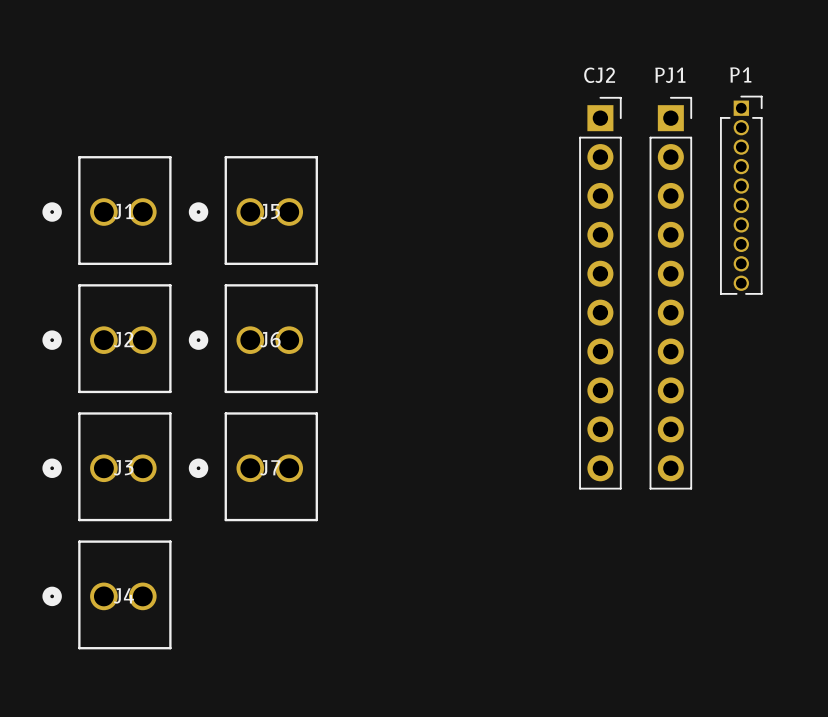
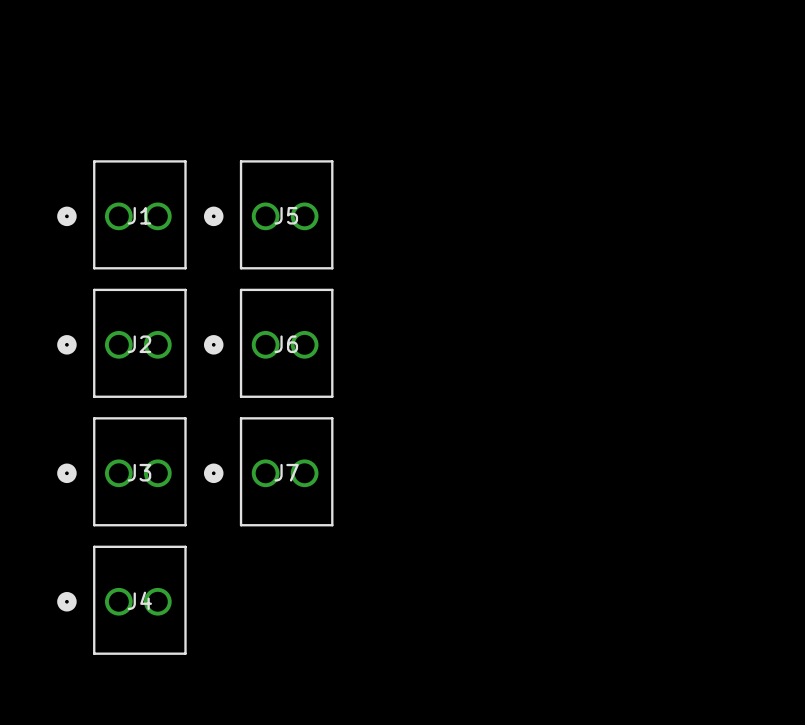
P1: (741, 195) -> none
CJ2: (600, 293) -> none
PJ1: (670, 293) -> none

